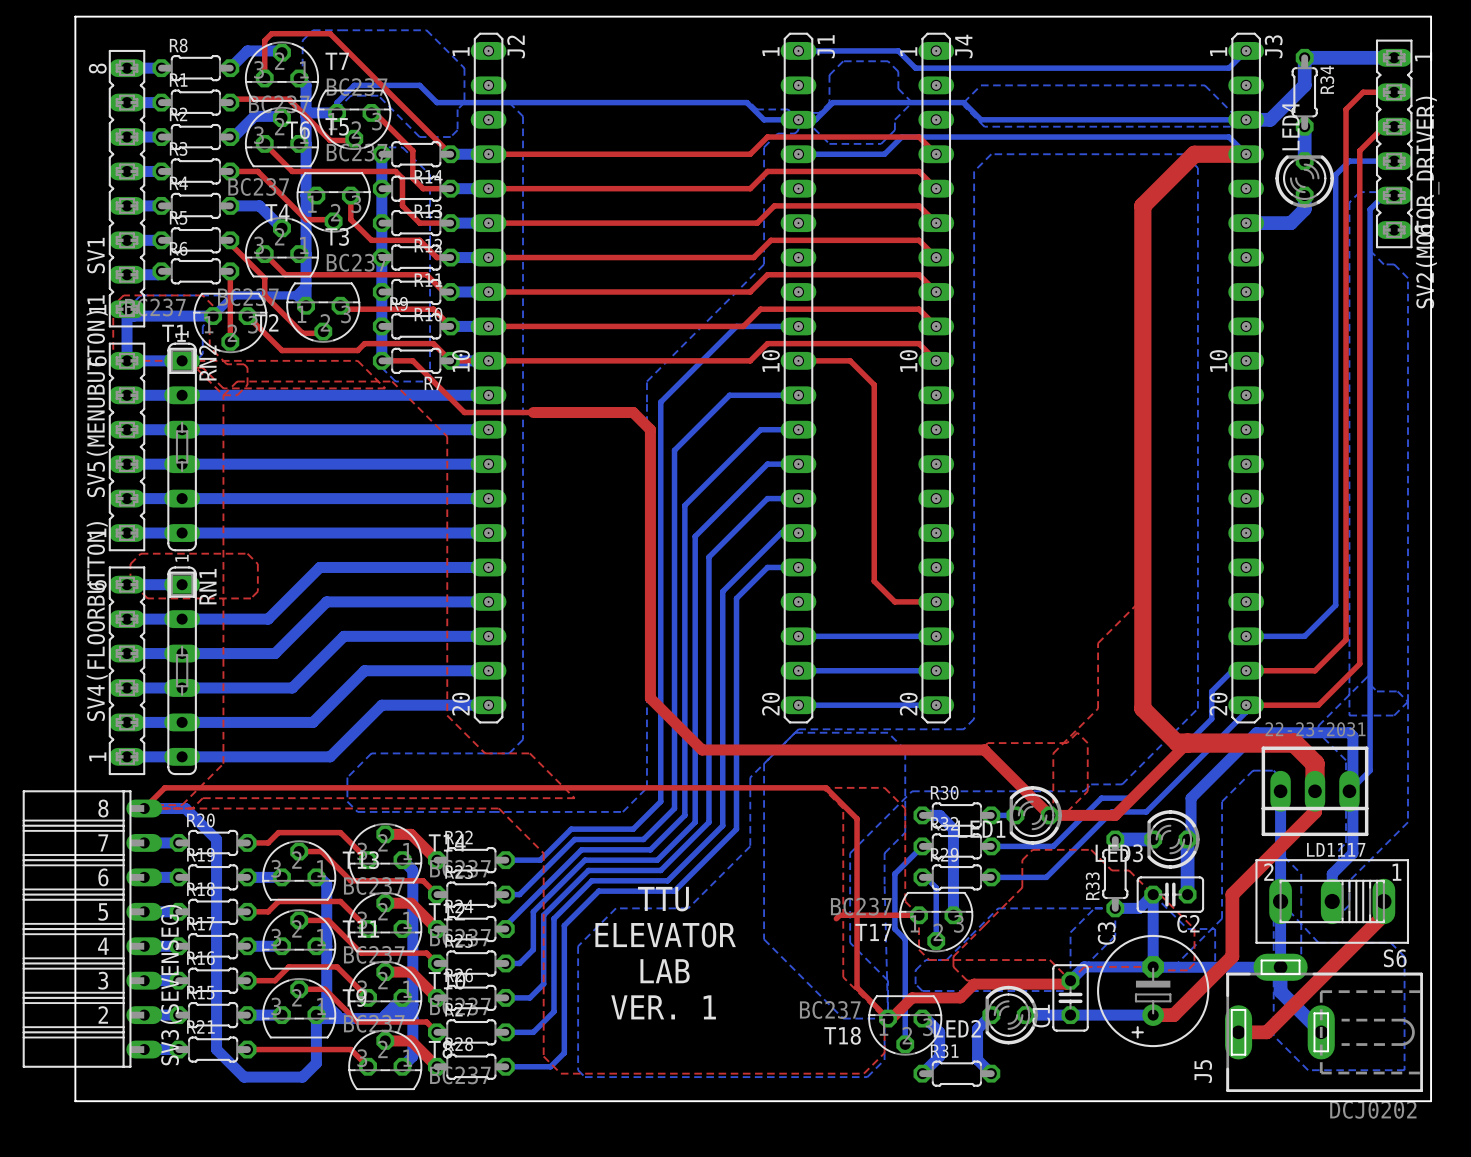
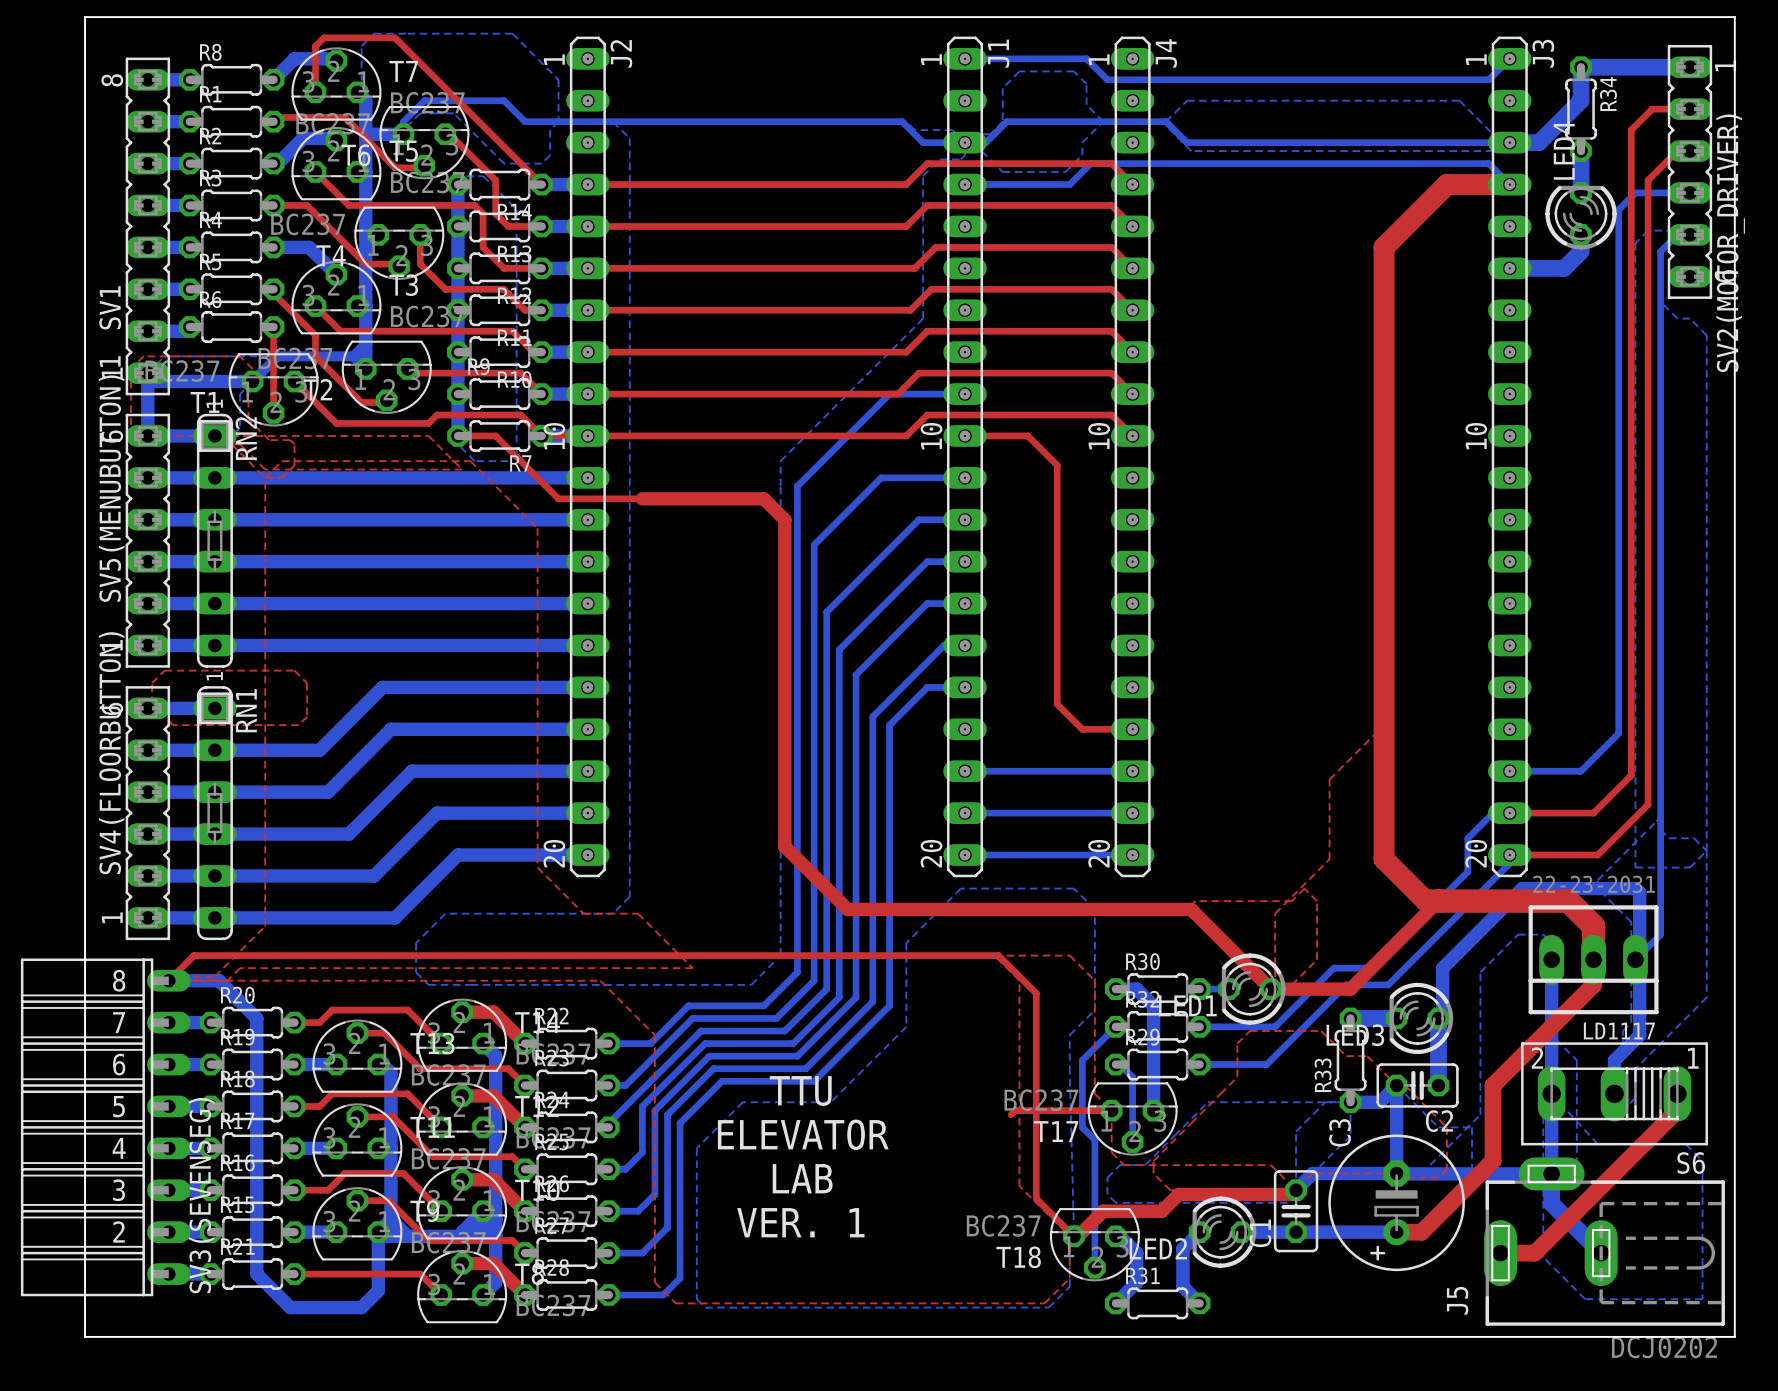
bottom zone outline: (795, 732) (798, 729) (963, 729) (974, 718) (974, 171) (991, 154) (1184, 154) (1197, 168) (1197, 708) (1122, 784) (1091, 784) (1084, 791) (912, 791) (850, 853) (850, 942) (888, 980) (888, 1015) -> none
bottom zone outline: (764, 763) (764, 939) (843, 1018) (884, 1018) (888, 1022) (888, 1018) -> none

